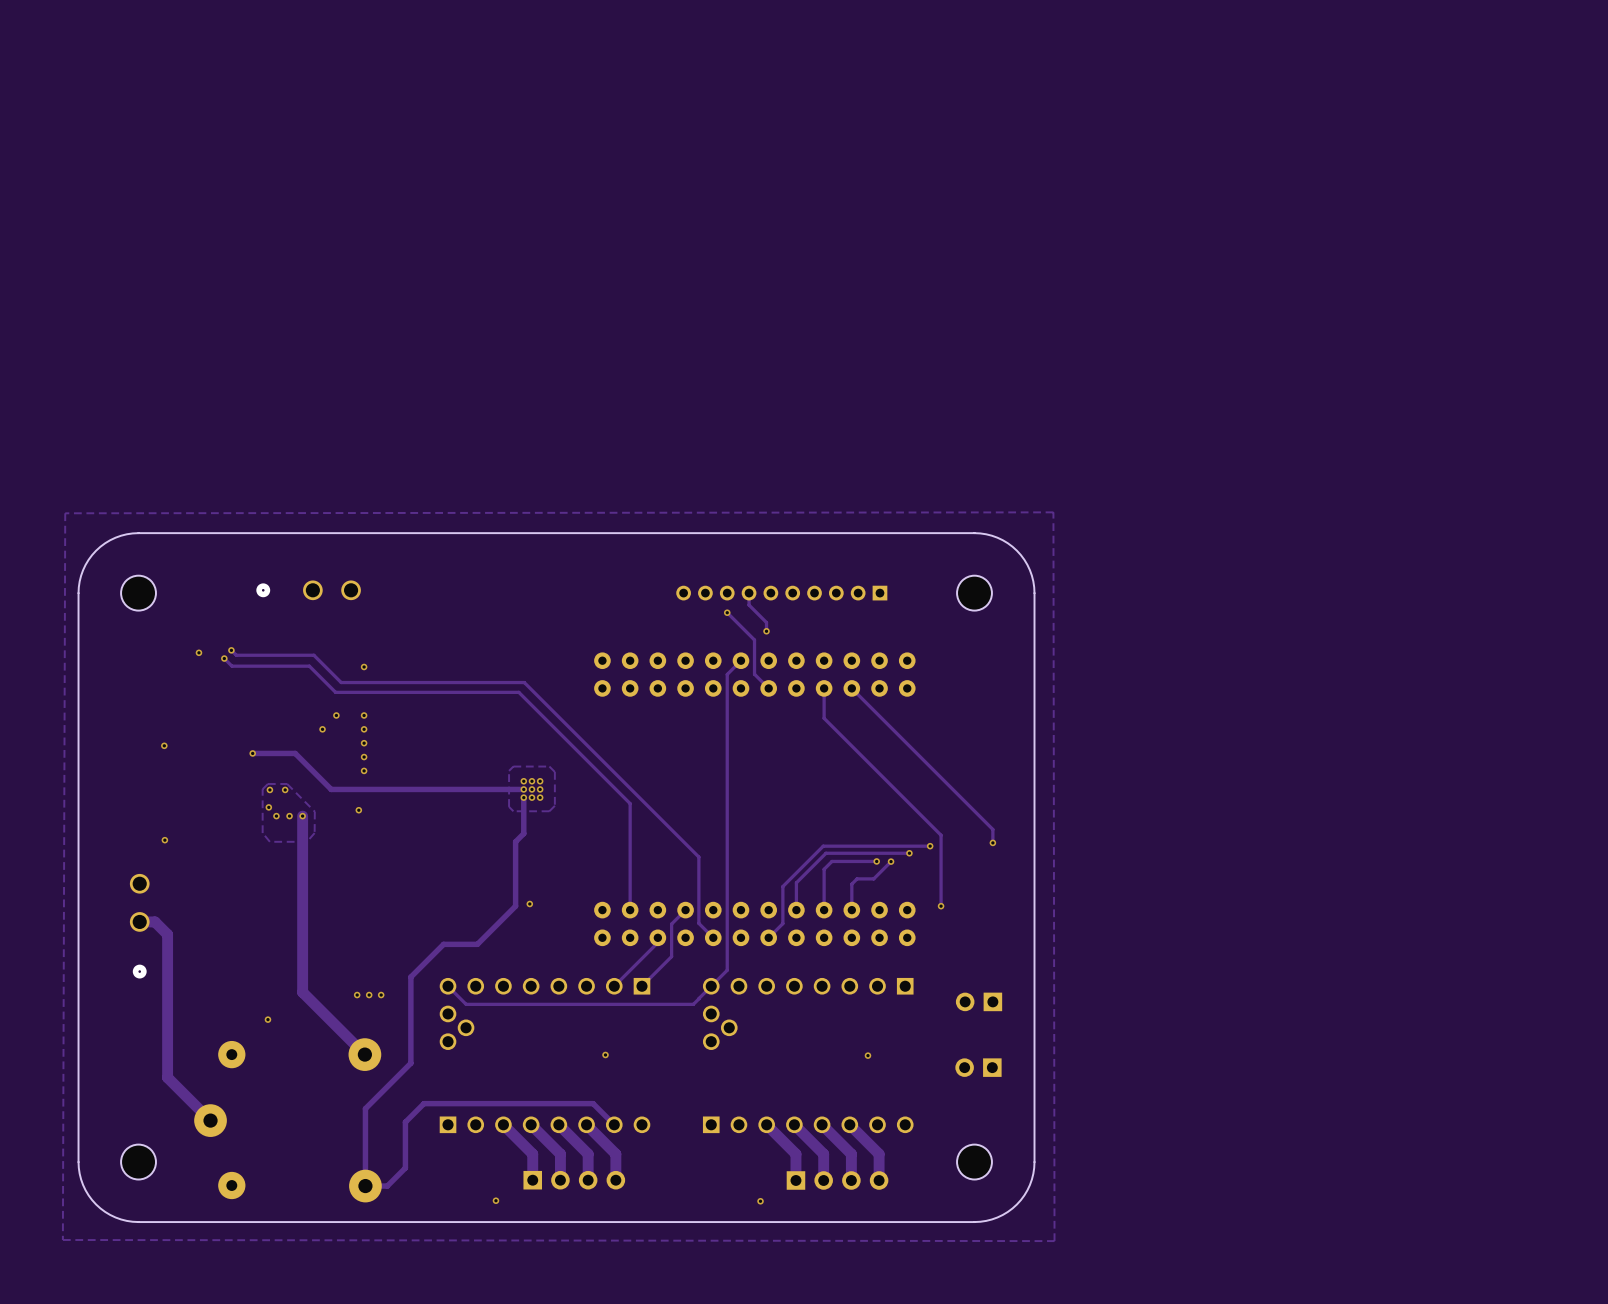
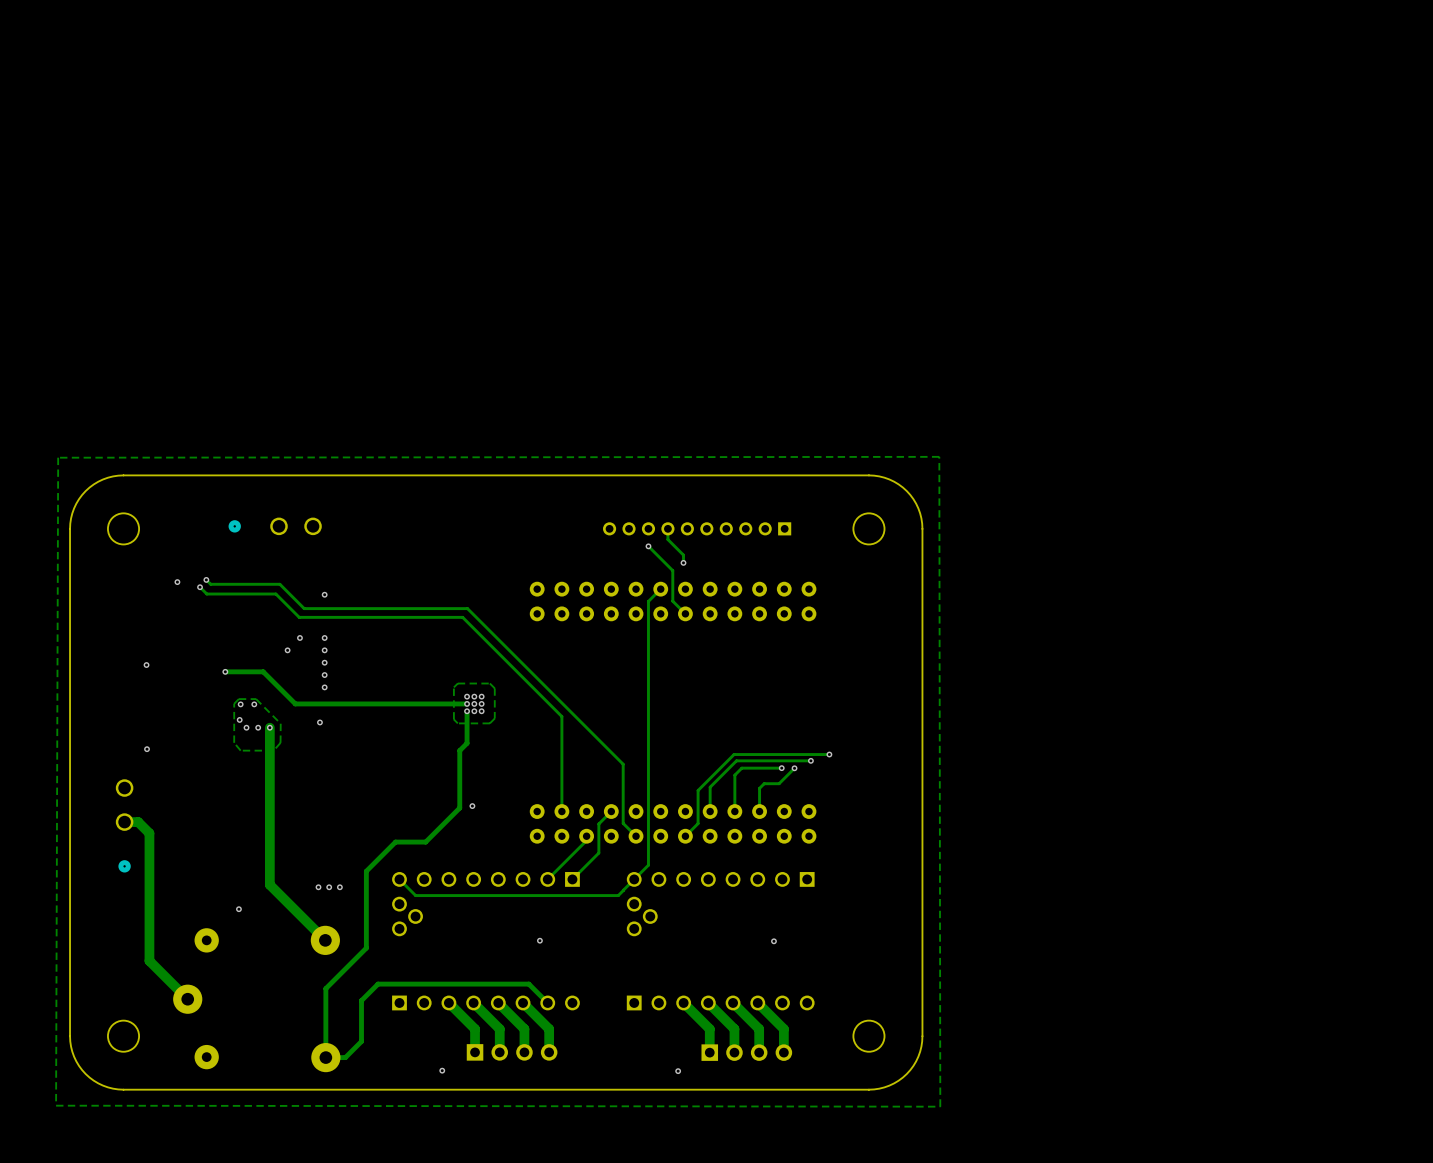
track: (824, 688) (824, 718) (941, 835) (941, 906) -> none
track: (851, 688) (992, 829) (992, 842) -> none
via: (992, 842) -> none
via: (941, 906) -> none
part: (979, 1001) -> none
part: (978, 1067) -> none

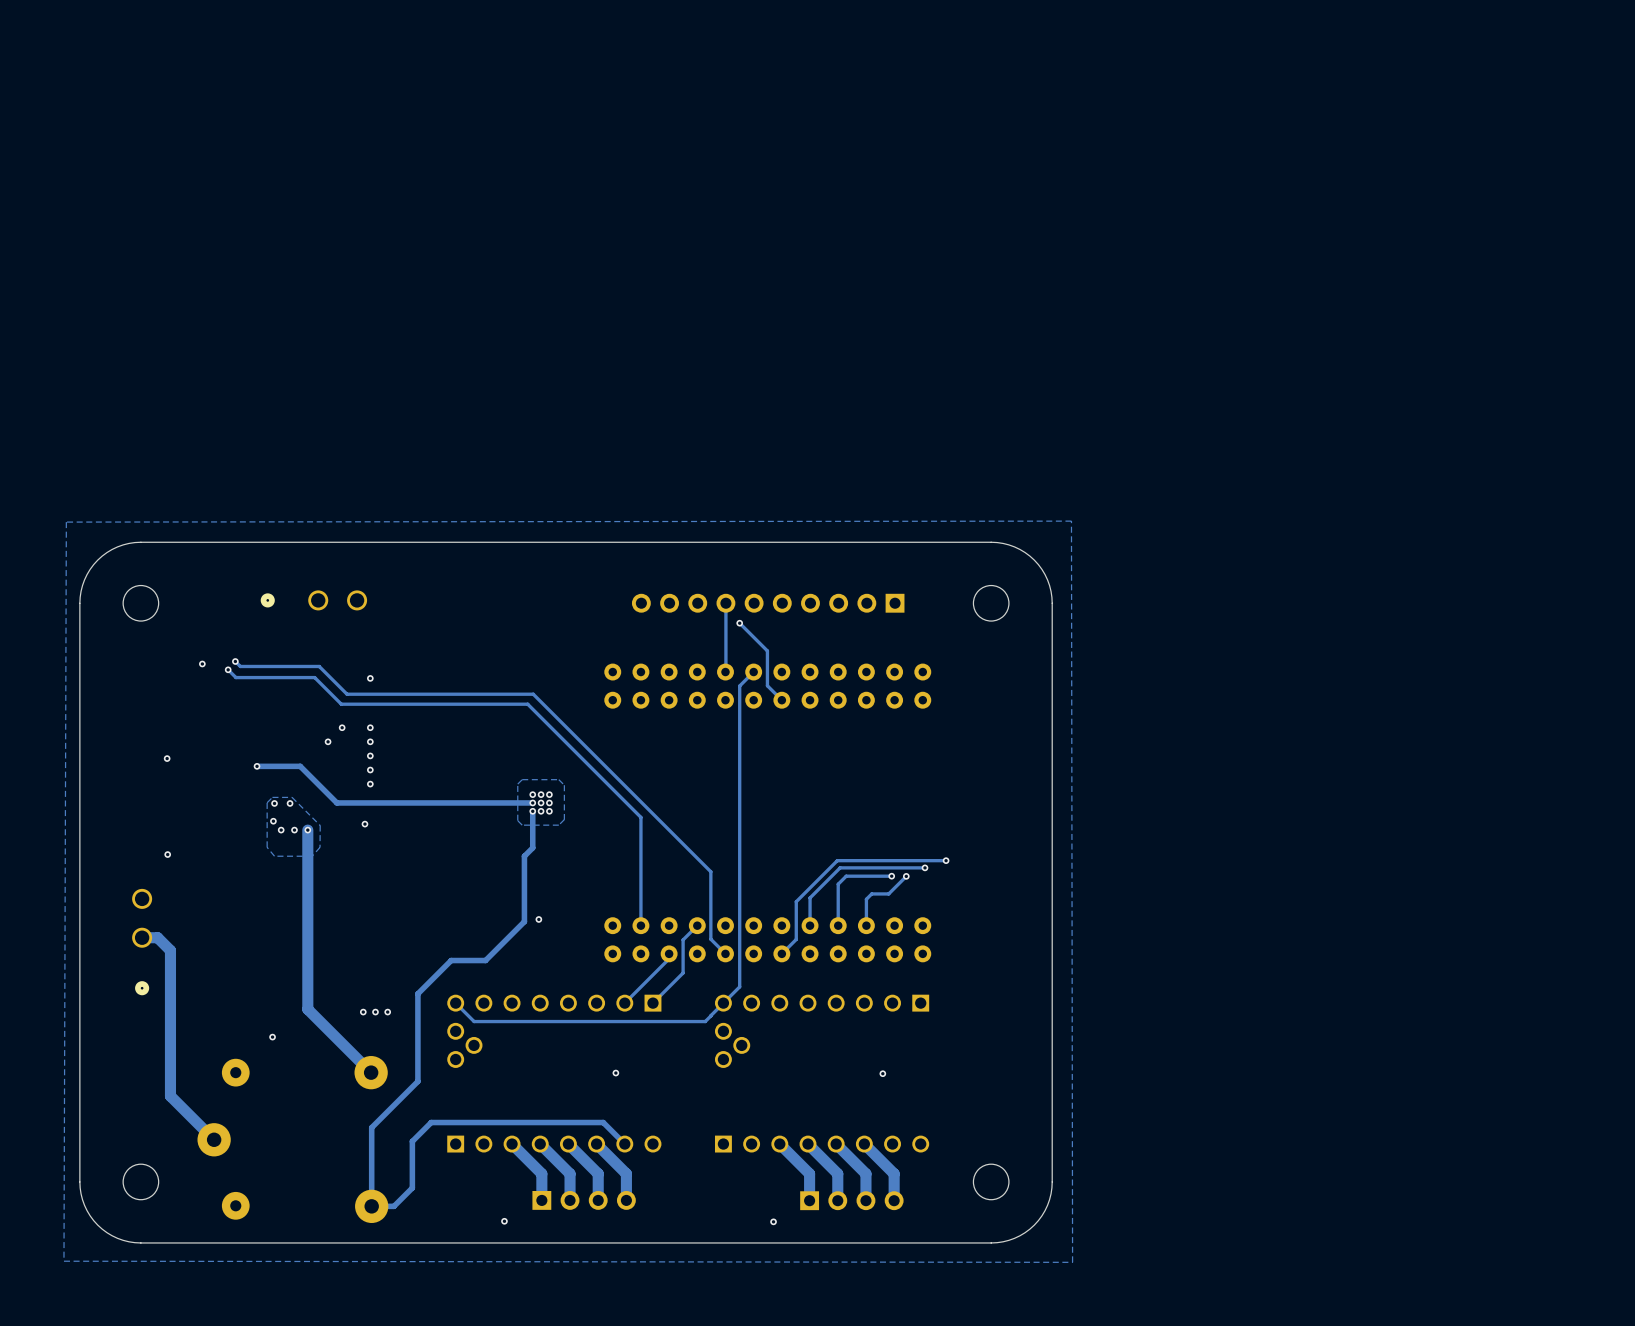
track: none -> (725, 603) (725, 671)
track: (667, 528) (667, 539) (683, 555) (683, 562) -> none
part: none -> (768, 603)
part: (697, 528) -> none
via: (683, 562) -> none

